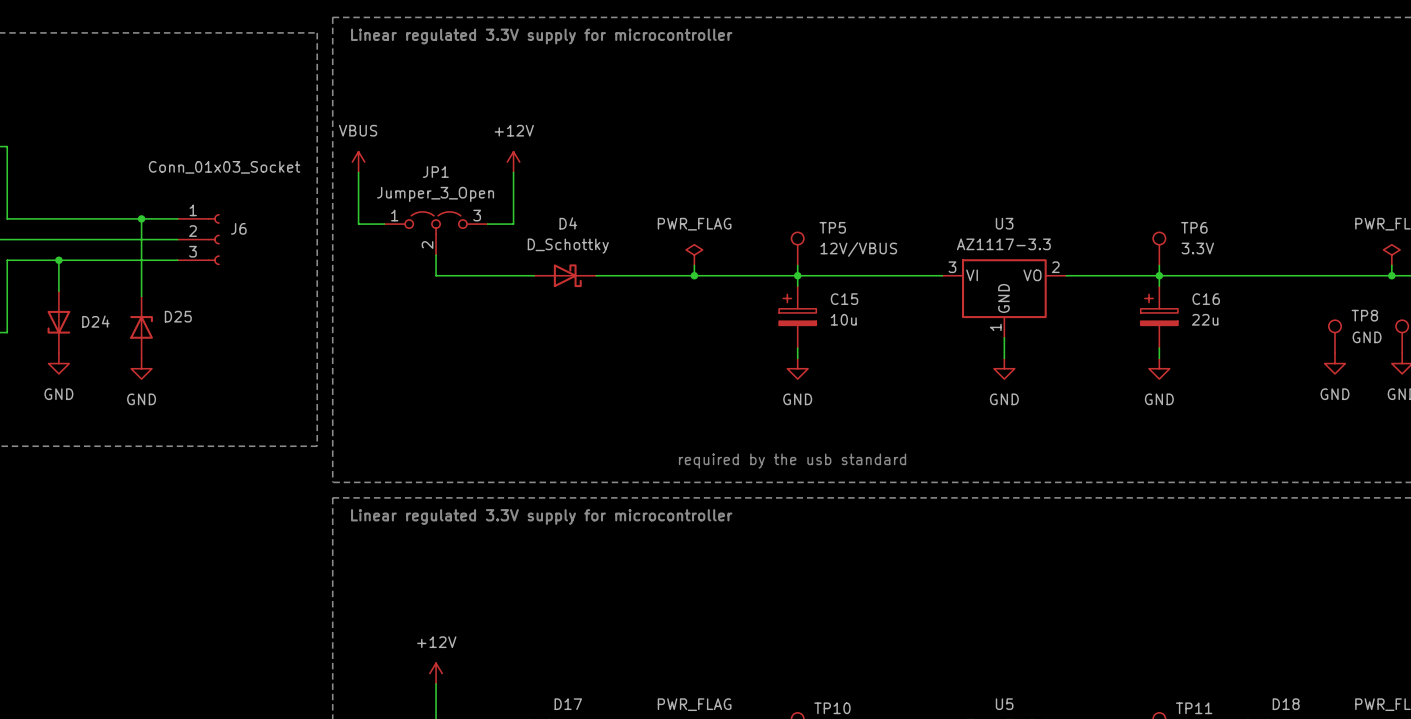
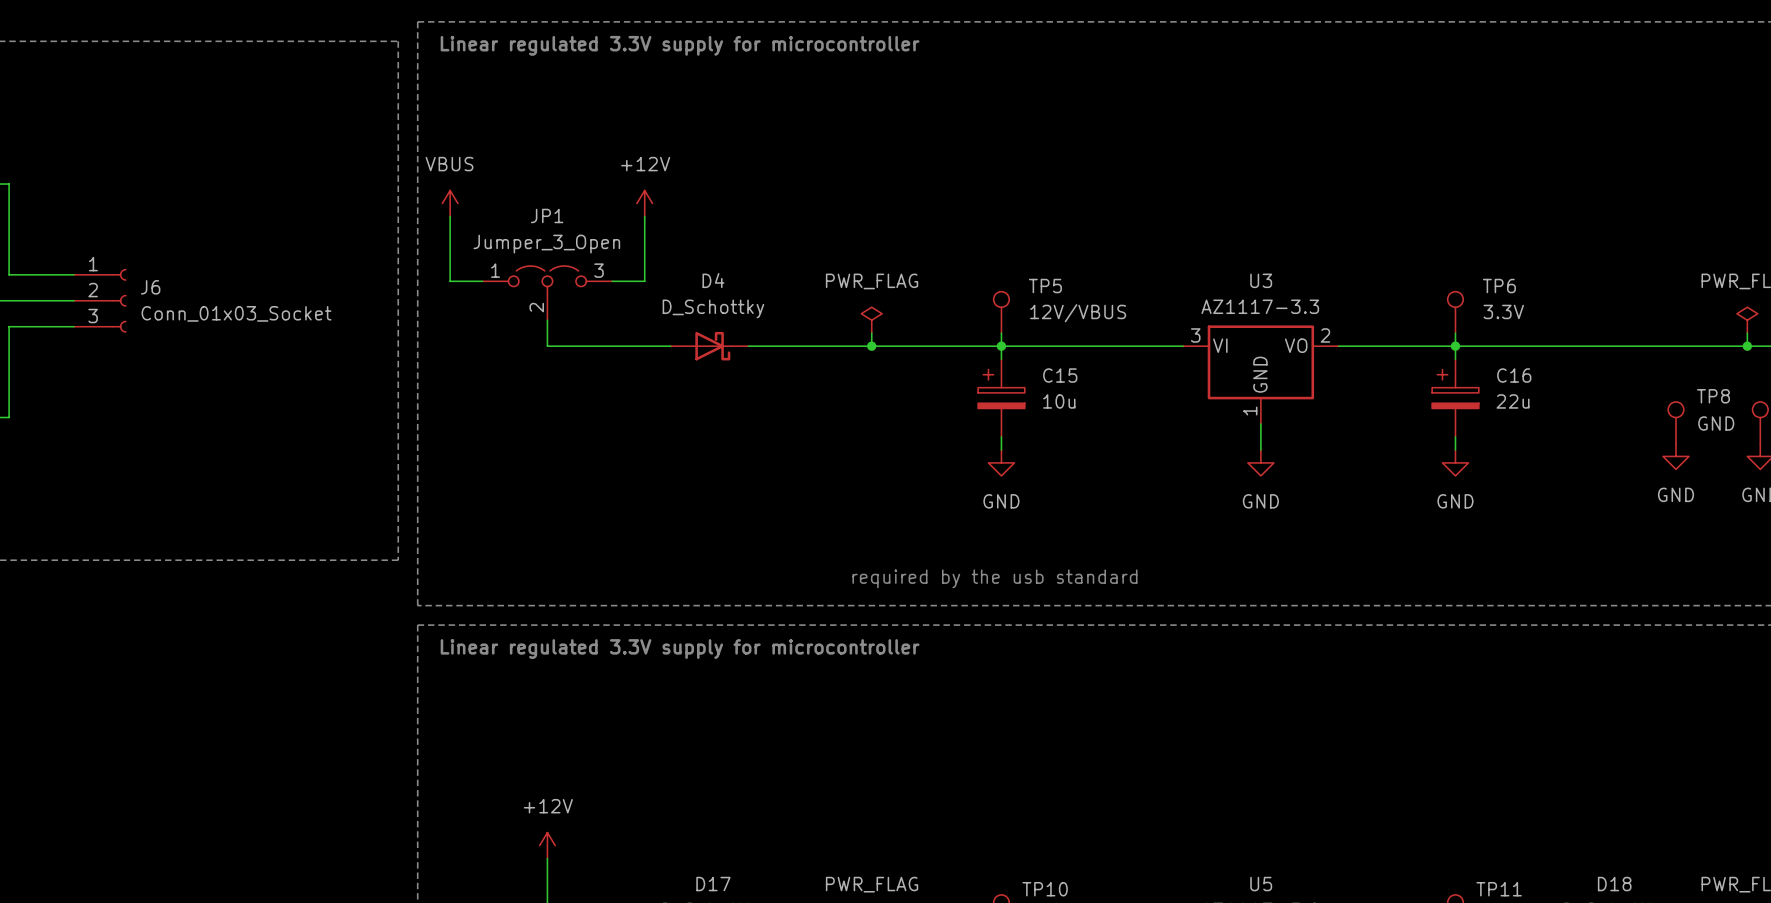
J6 value position: Conn_01x03_Socket (224, 167) -> Conn_01x03_Socket (236, 313)
wire: (58, 218) (177, 218) -> none
wire: (141, 218) (141, 296) -> none
junction: (141, 218) -> none
wire: (58, 239) (177, 239) -> none
J6 position: (198, 239) -> (100, 300)
junction: (58, 260) -> none
wire: (177, 260) (58, 260) (58, 291) -> none
D24: (58, 322) -> none
D25: (141, 327) -> none
power symbol: GND (58, 363) -> none
power symbol: GND (141, 368) -> none

